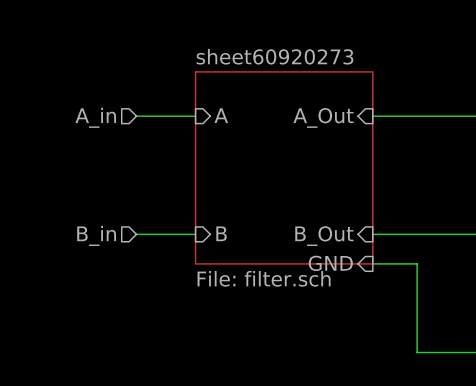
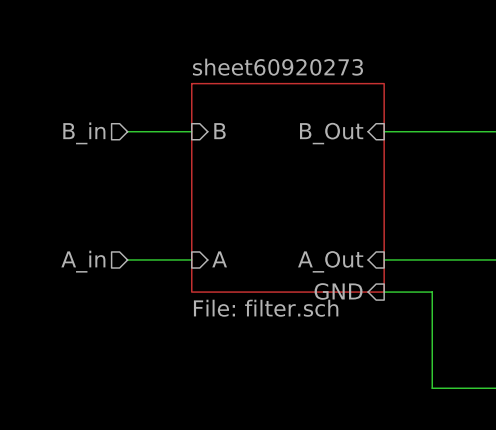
sheet pin: A (221, 115) -> B (219, 131)
hierarchical label: A_in (95, 117) -> B_in (84, 133)
sheet pin: A_Out (323, 117) -> B_Out (331, 133)
sheet pin: B (221, 233) -> A (219, 259)
hierarchical label: B_in (96, 235) -> A_in (83, 261)
sheet pin: B_Out (324, 236) -> A_Out (330, 261)

